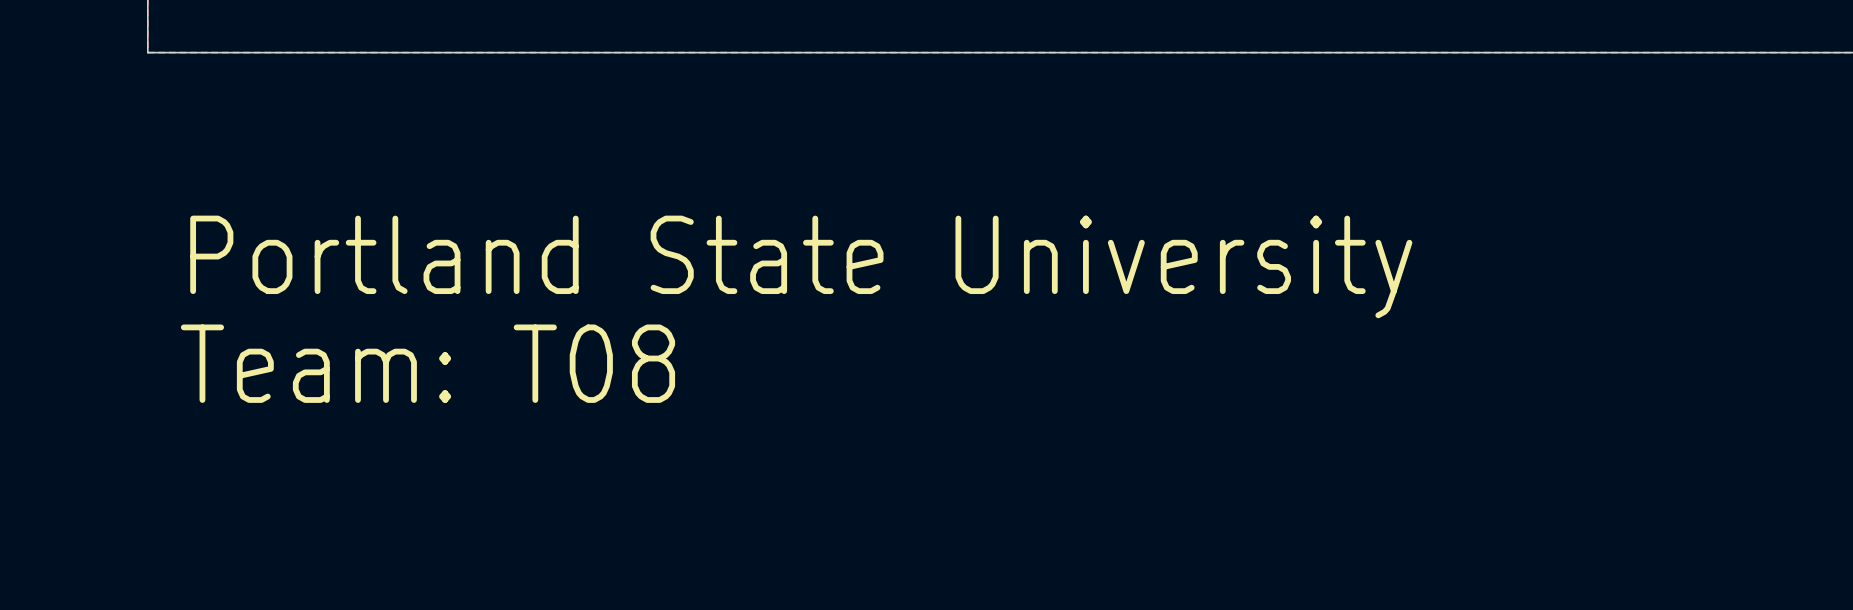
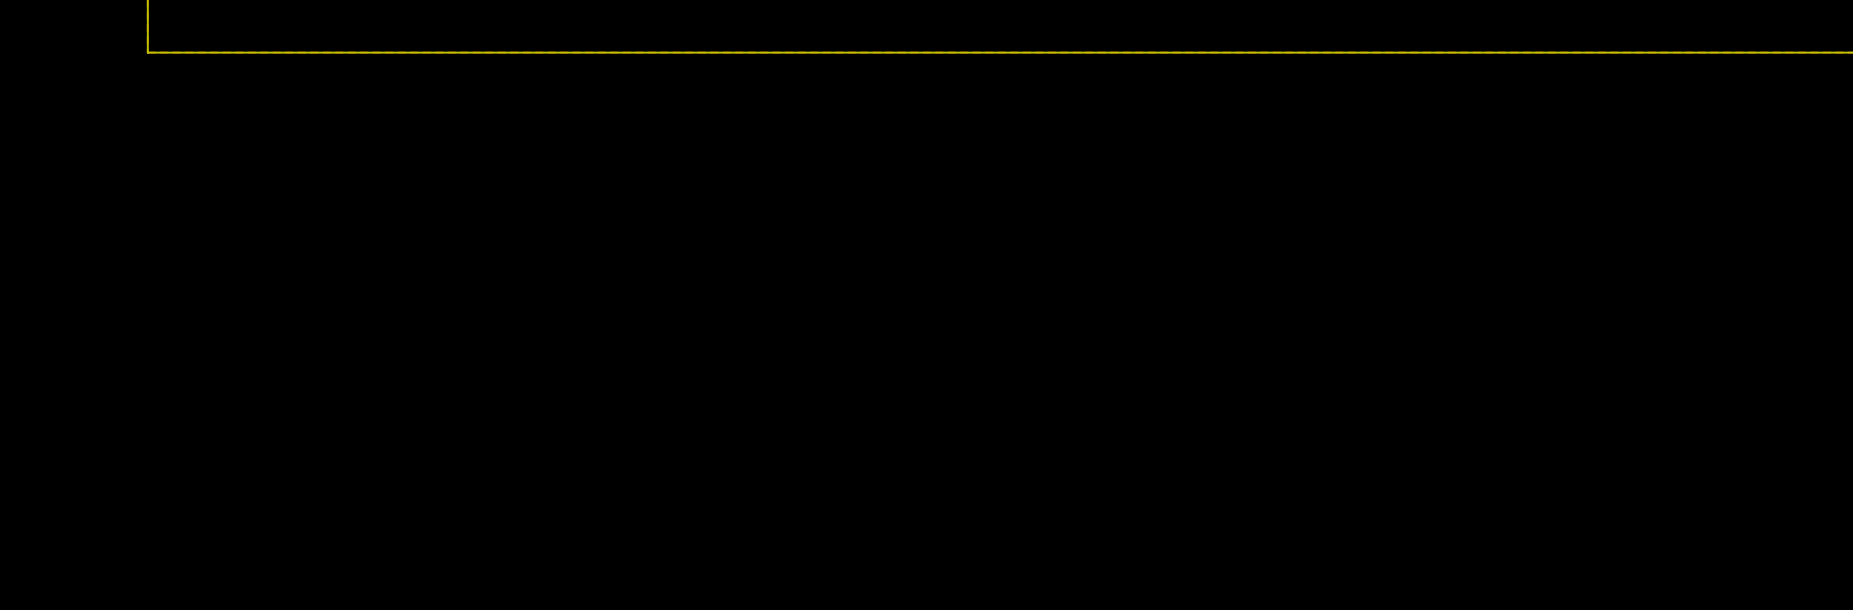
text: Portland State University (801, 266) -> none
text: Team: T08 (427, 363) -> none

